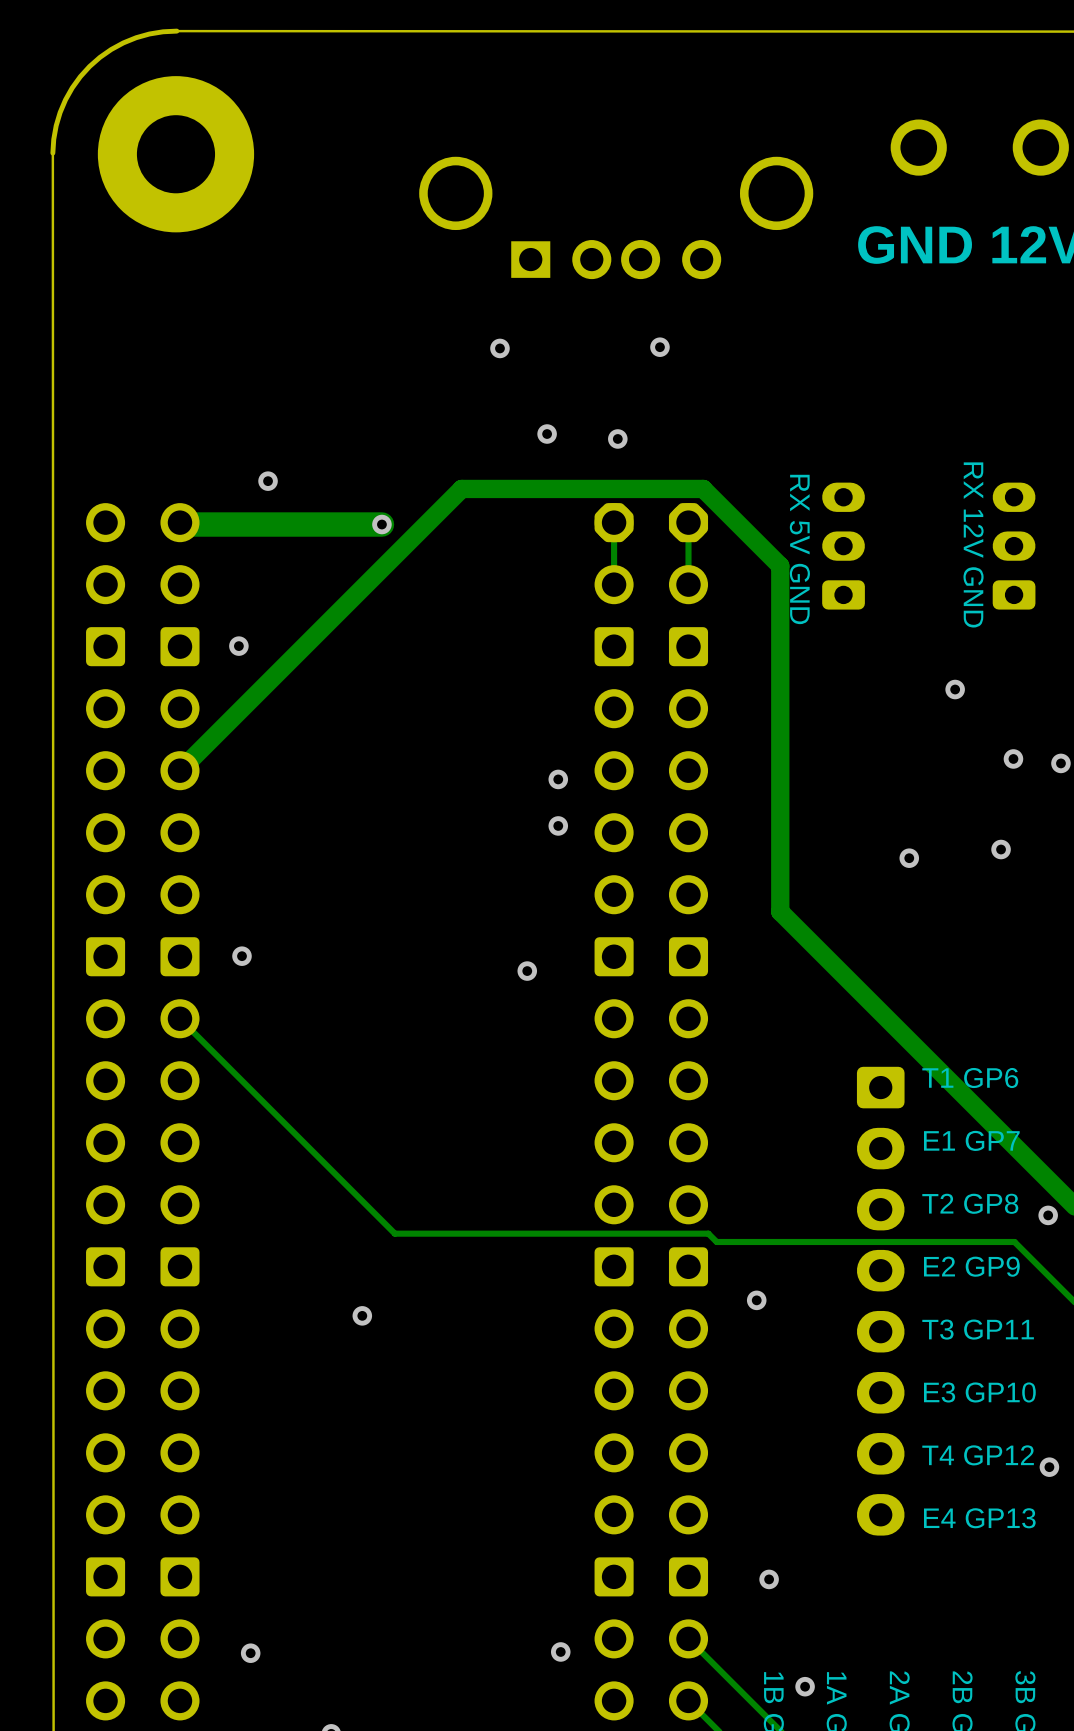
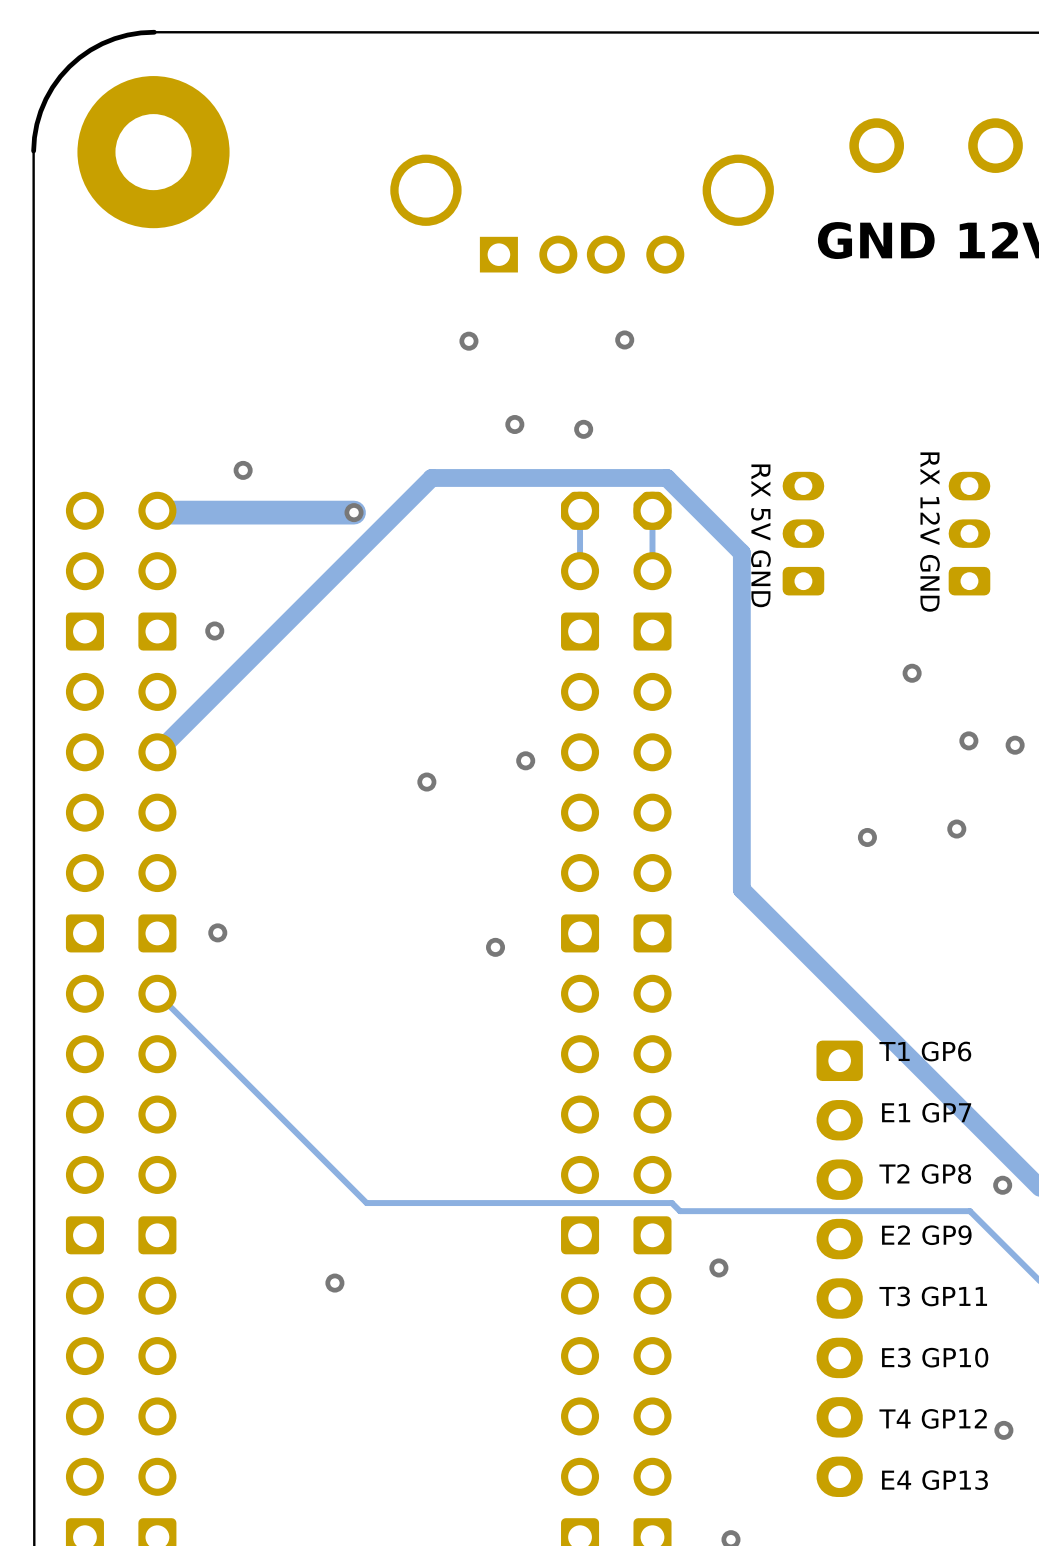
via position: (558, 825) -> (426, 782)

